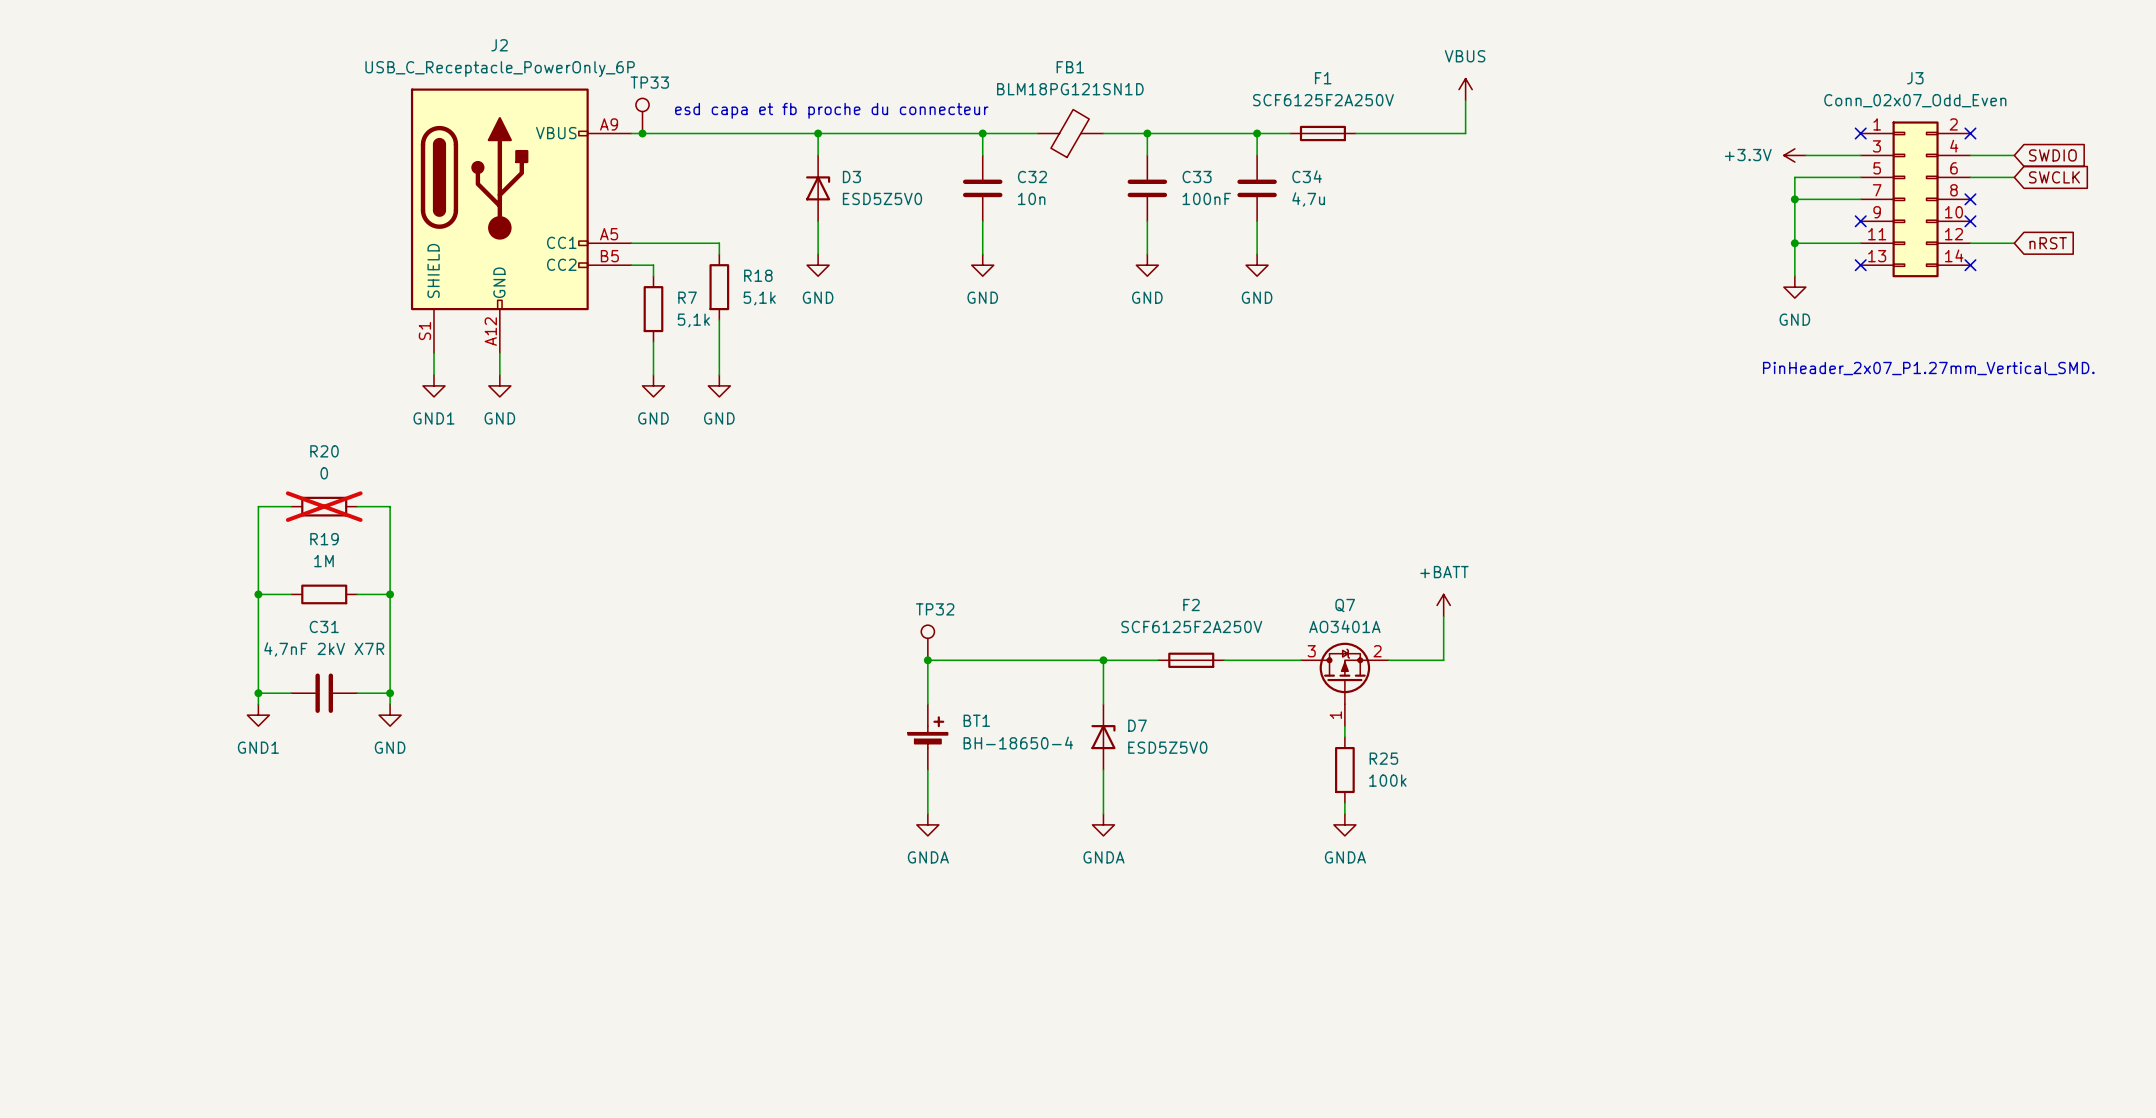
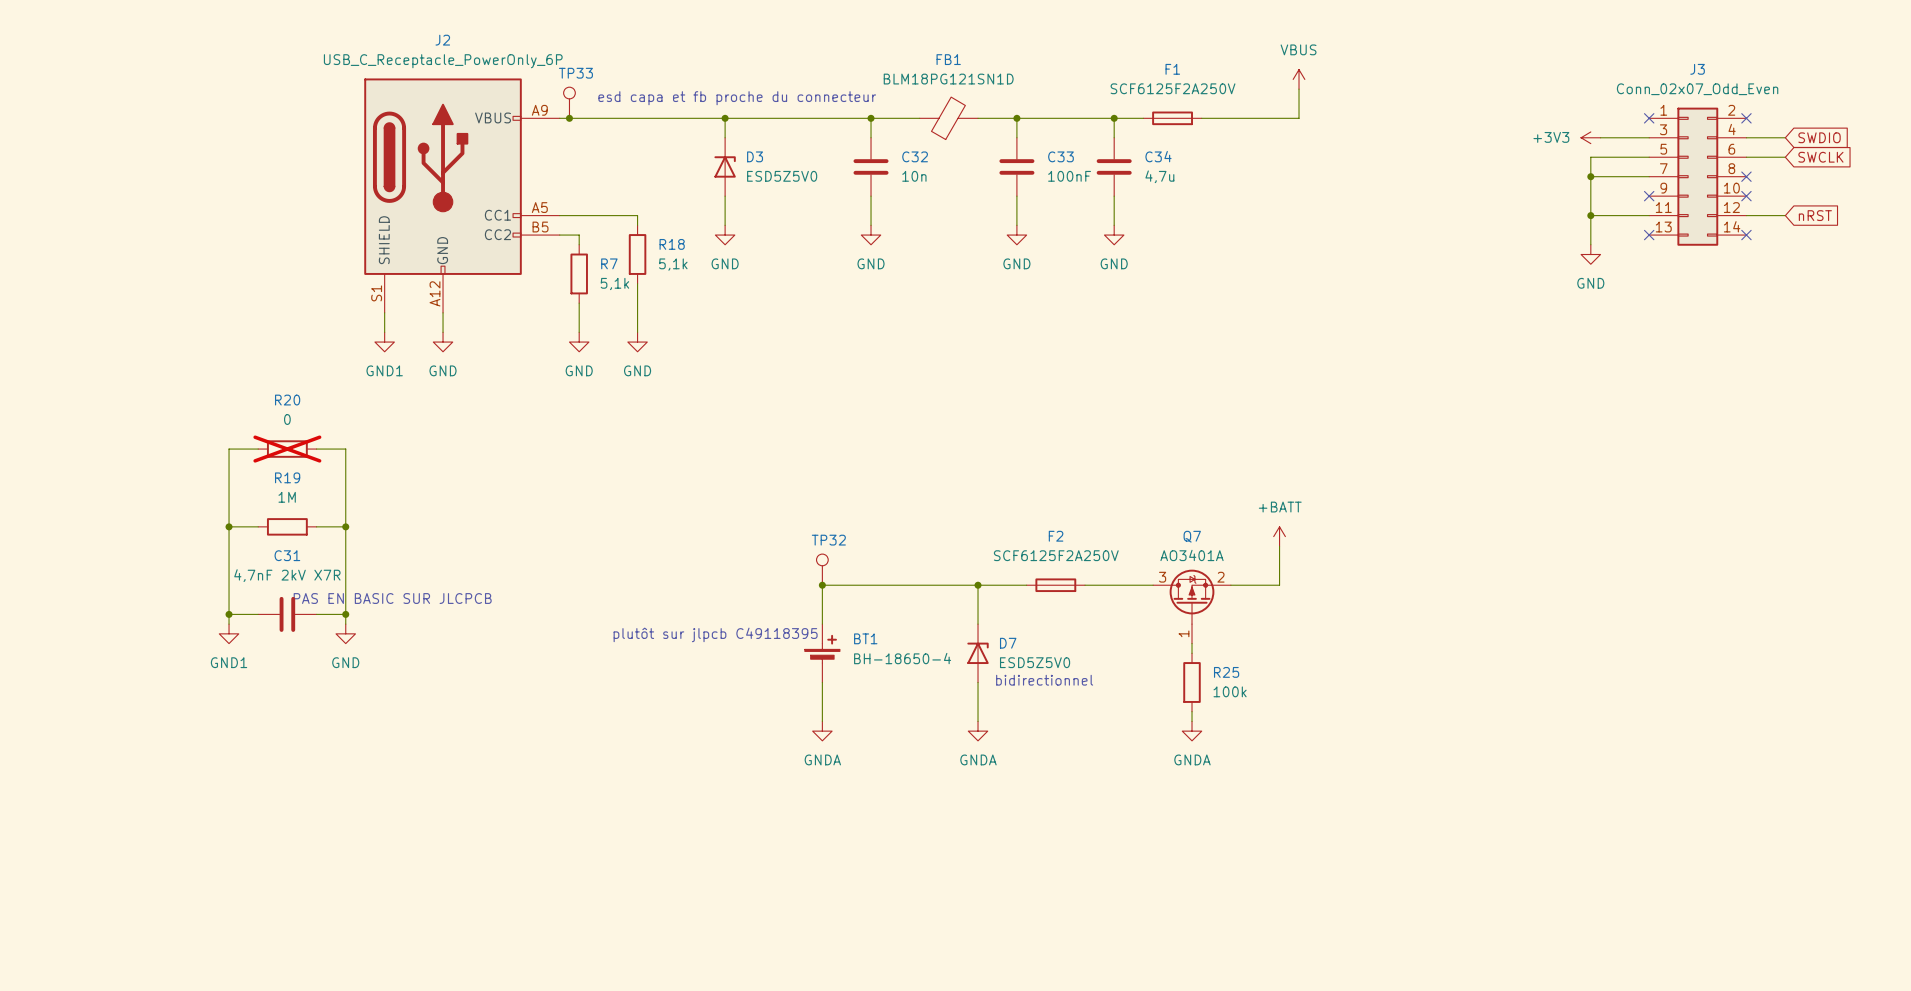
power symbol: +3.3V (1794, 155) -> +3V3 (1590, 137)
text: PinHeader_2x07_P1.27mm_Vertical_SMD. (1928, 368) -> none
text: none -> PAS EN BASIC SUR JLCPCB (392, 598)
text: none -> plutôt sur jlpcb C49118395 (715, 634)
text: none -> bidirectionnel (1044, 680)

